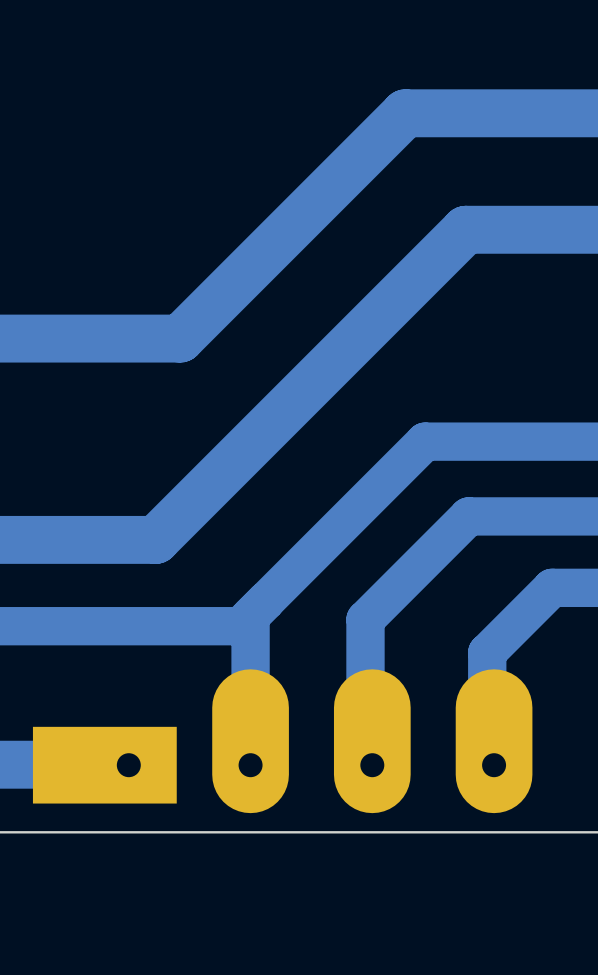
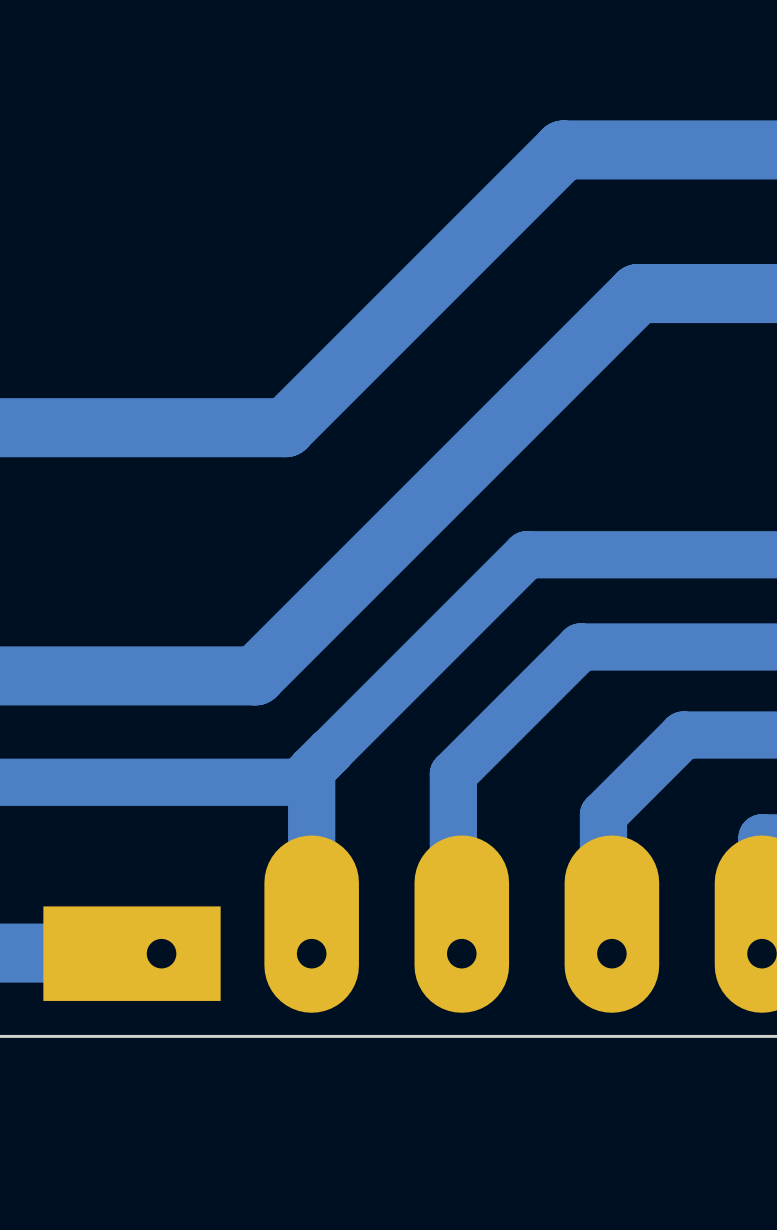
track: (454, 113) (405, 113) (180, 338) -> (563, 149) (285, 427) (224, 427)
track: (515, 229) (465, 229) (155, 539) -> (637, 293) (255, 675) (194, 675)

